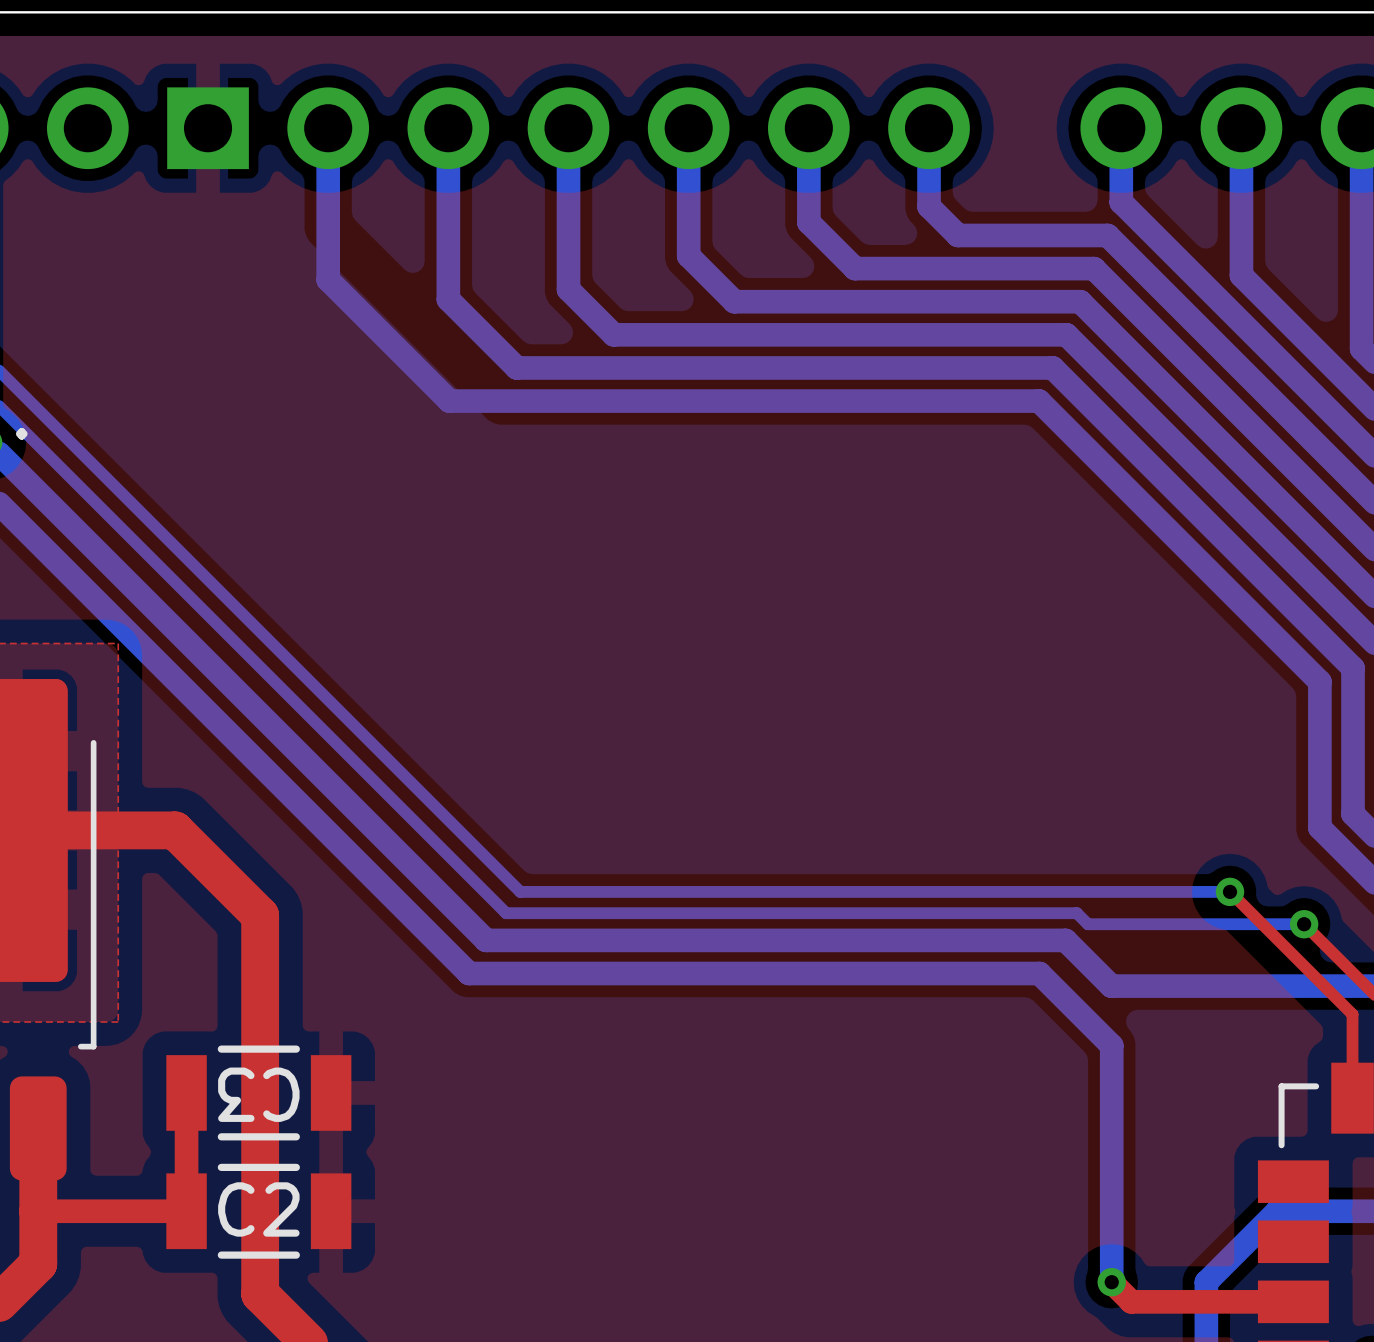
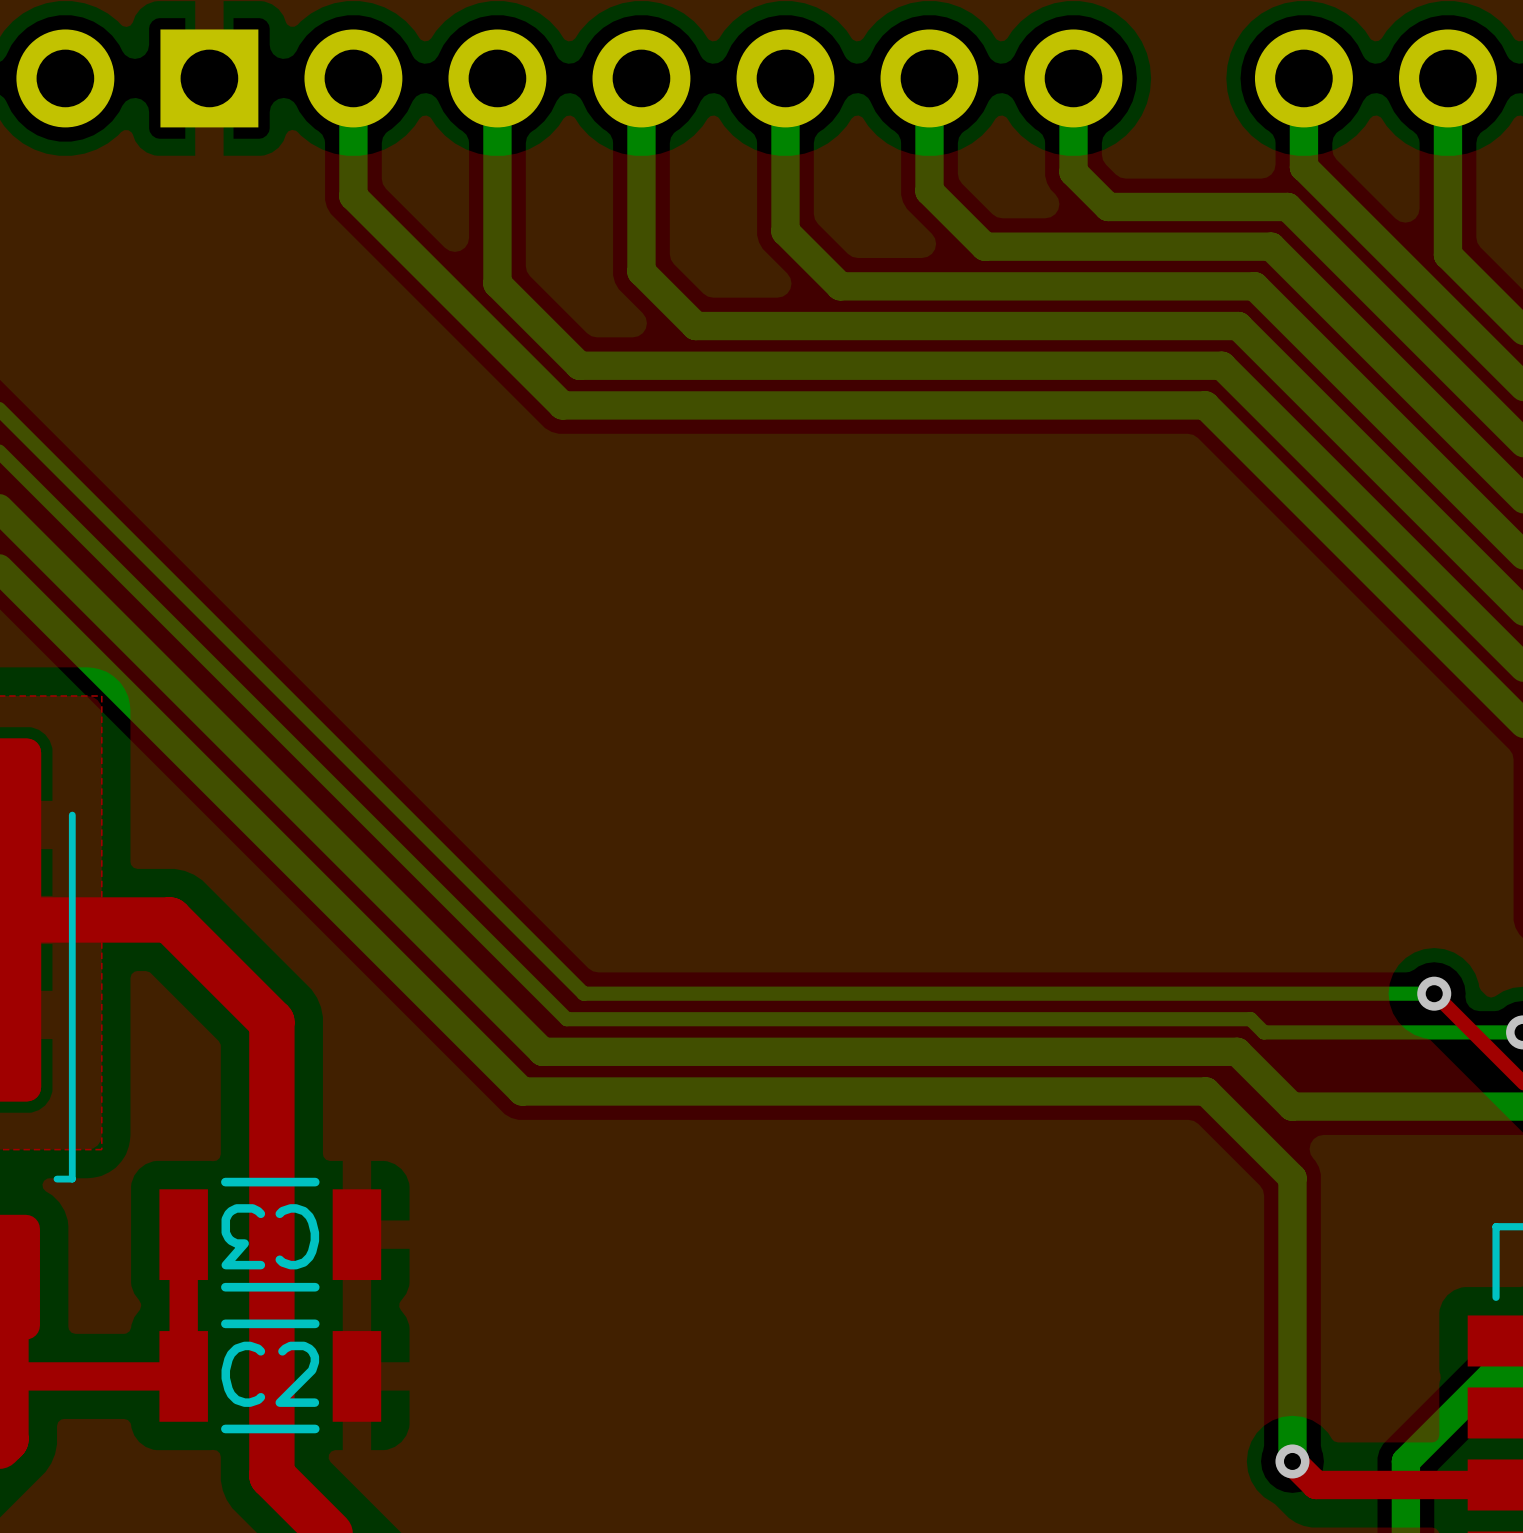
bottom track: (328, 226) (328, 279) (449, 401) (502, 401) -> (353, 196) (562, 405)

